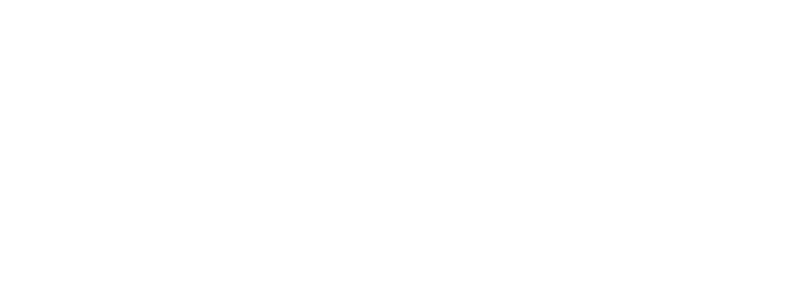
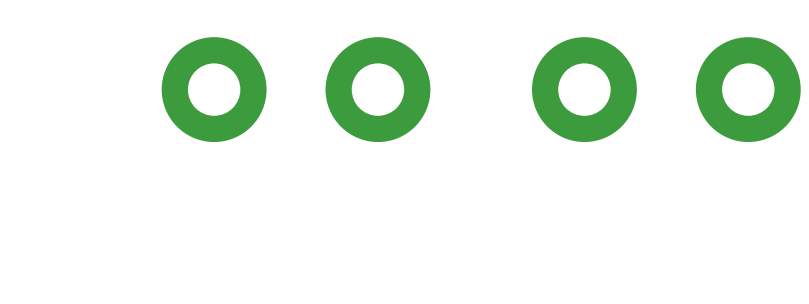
part: none -> (296, 89)
part: none -> (666, 89)

